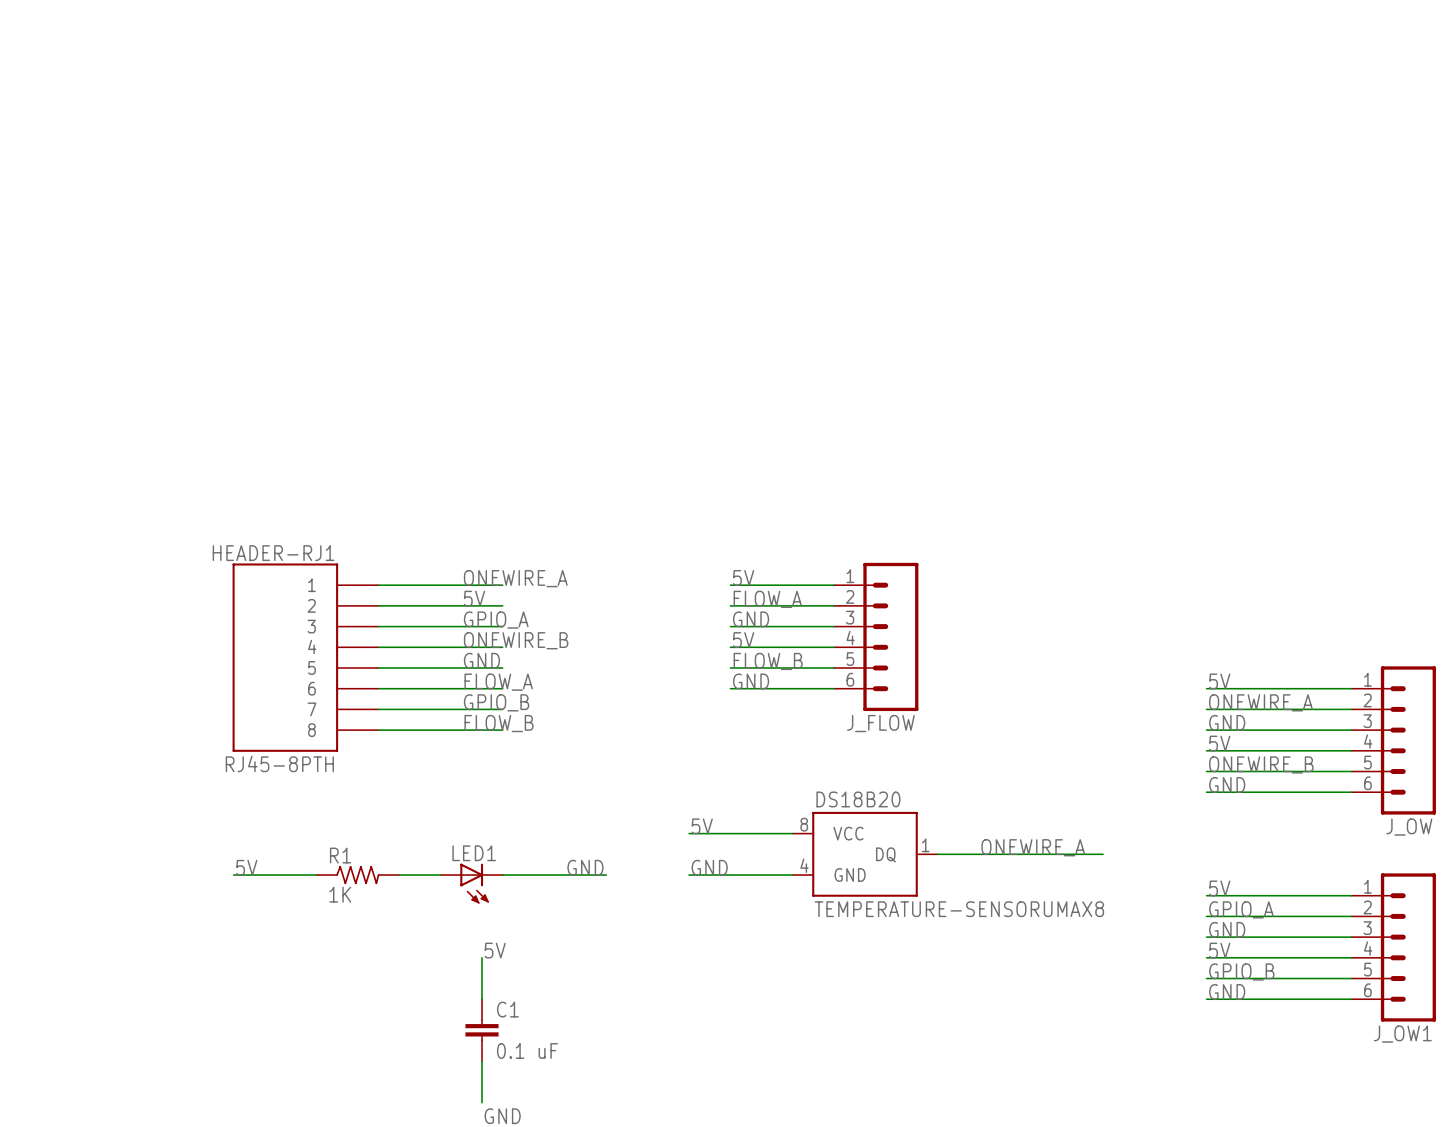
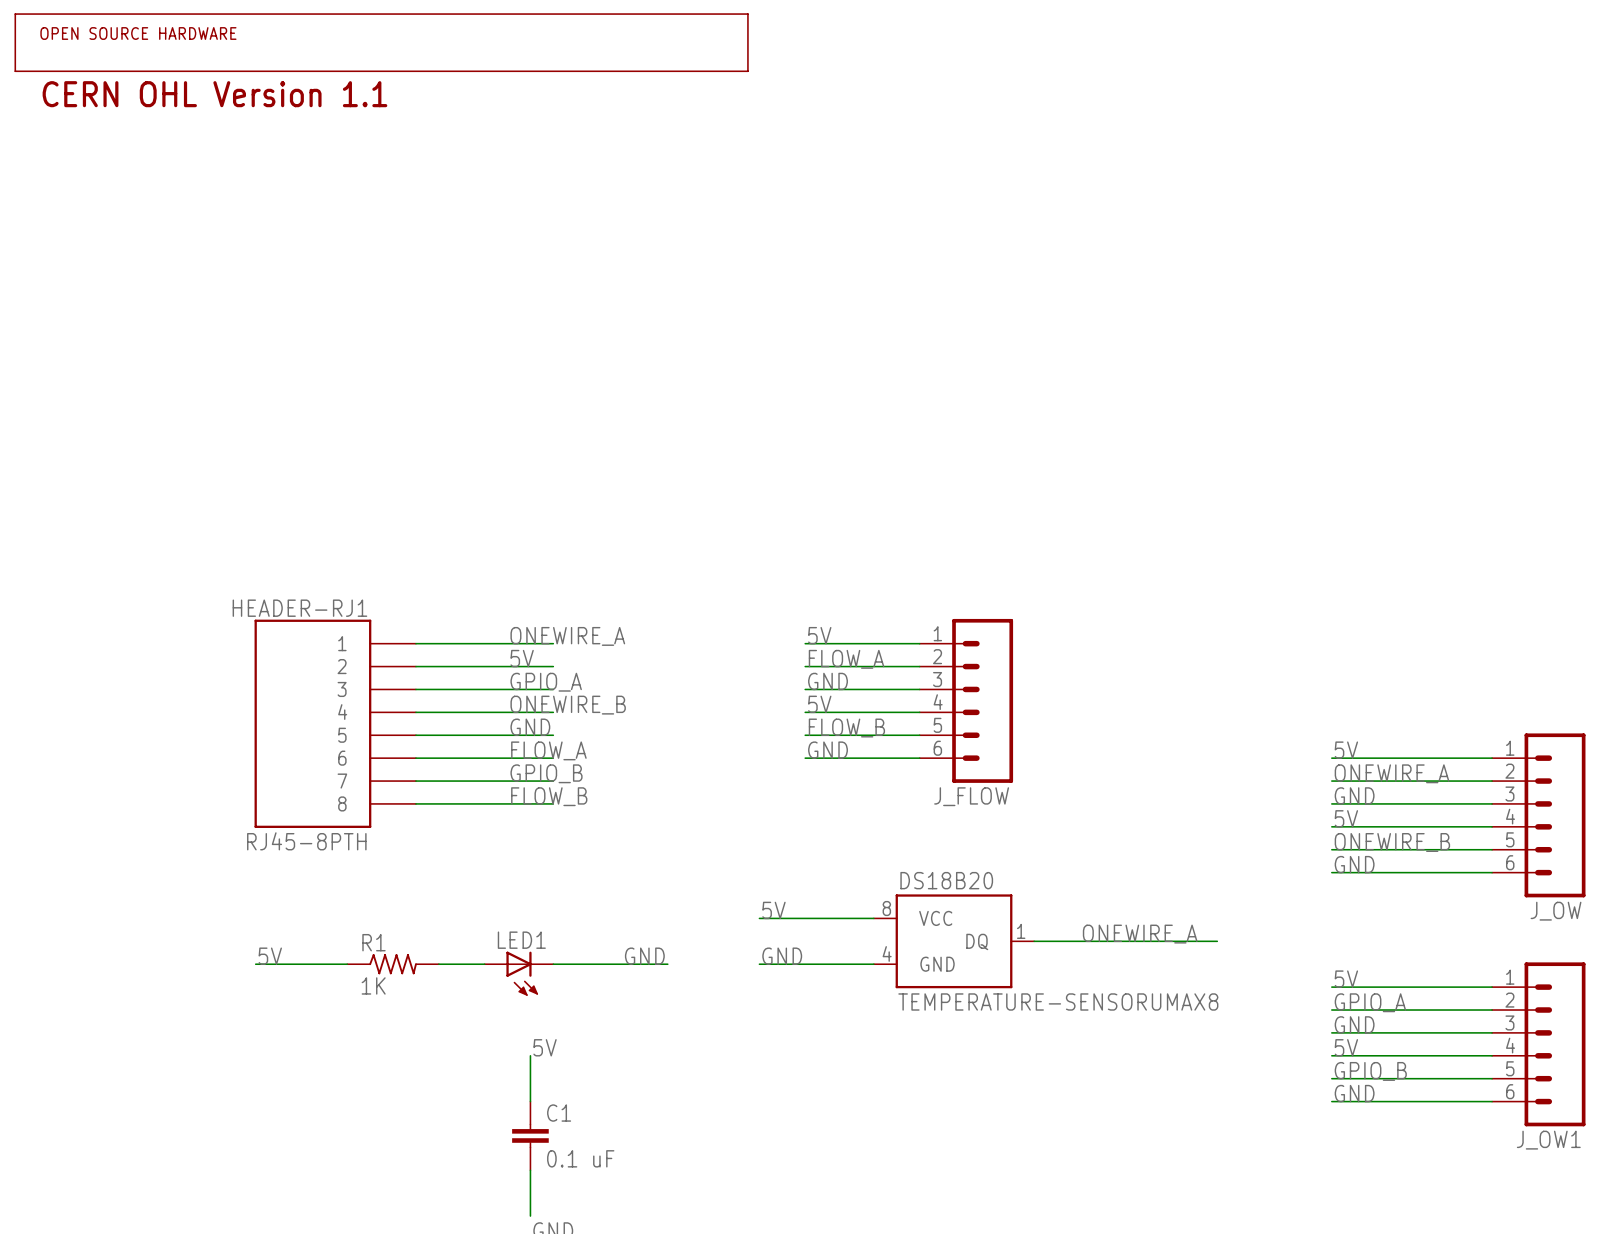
part: none -> (381, 42)

